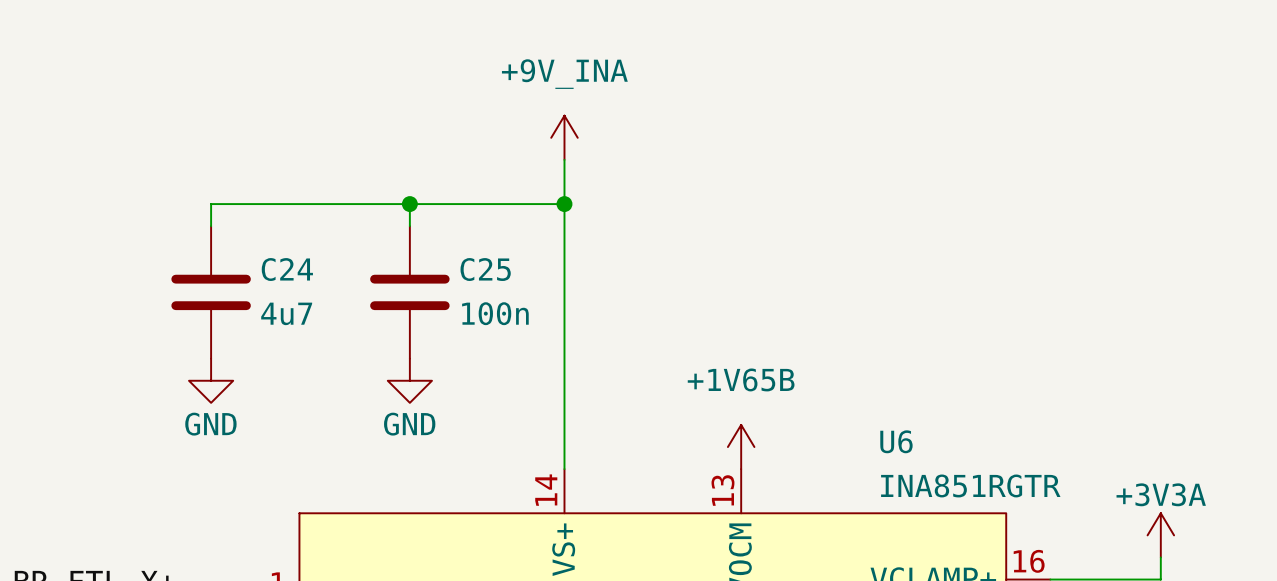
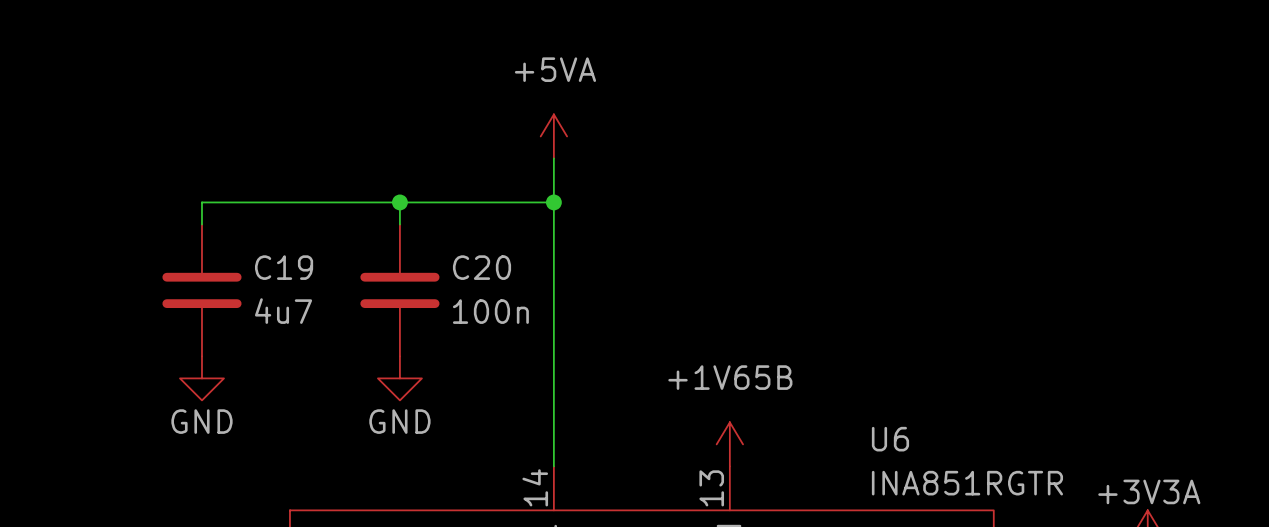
power symbol: +9V_INA (564, 137) -> +5VA (553, 136)
C24 name: C24 (287, 269) -> C19 (284, 267)
C25 name: C25 (485, 269) -> C20 (482, 267)

